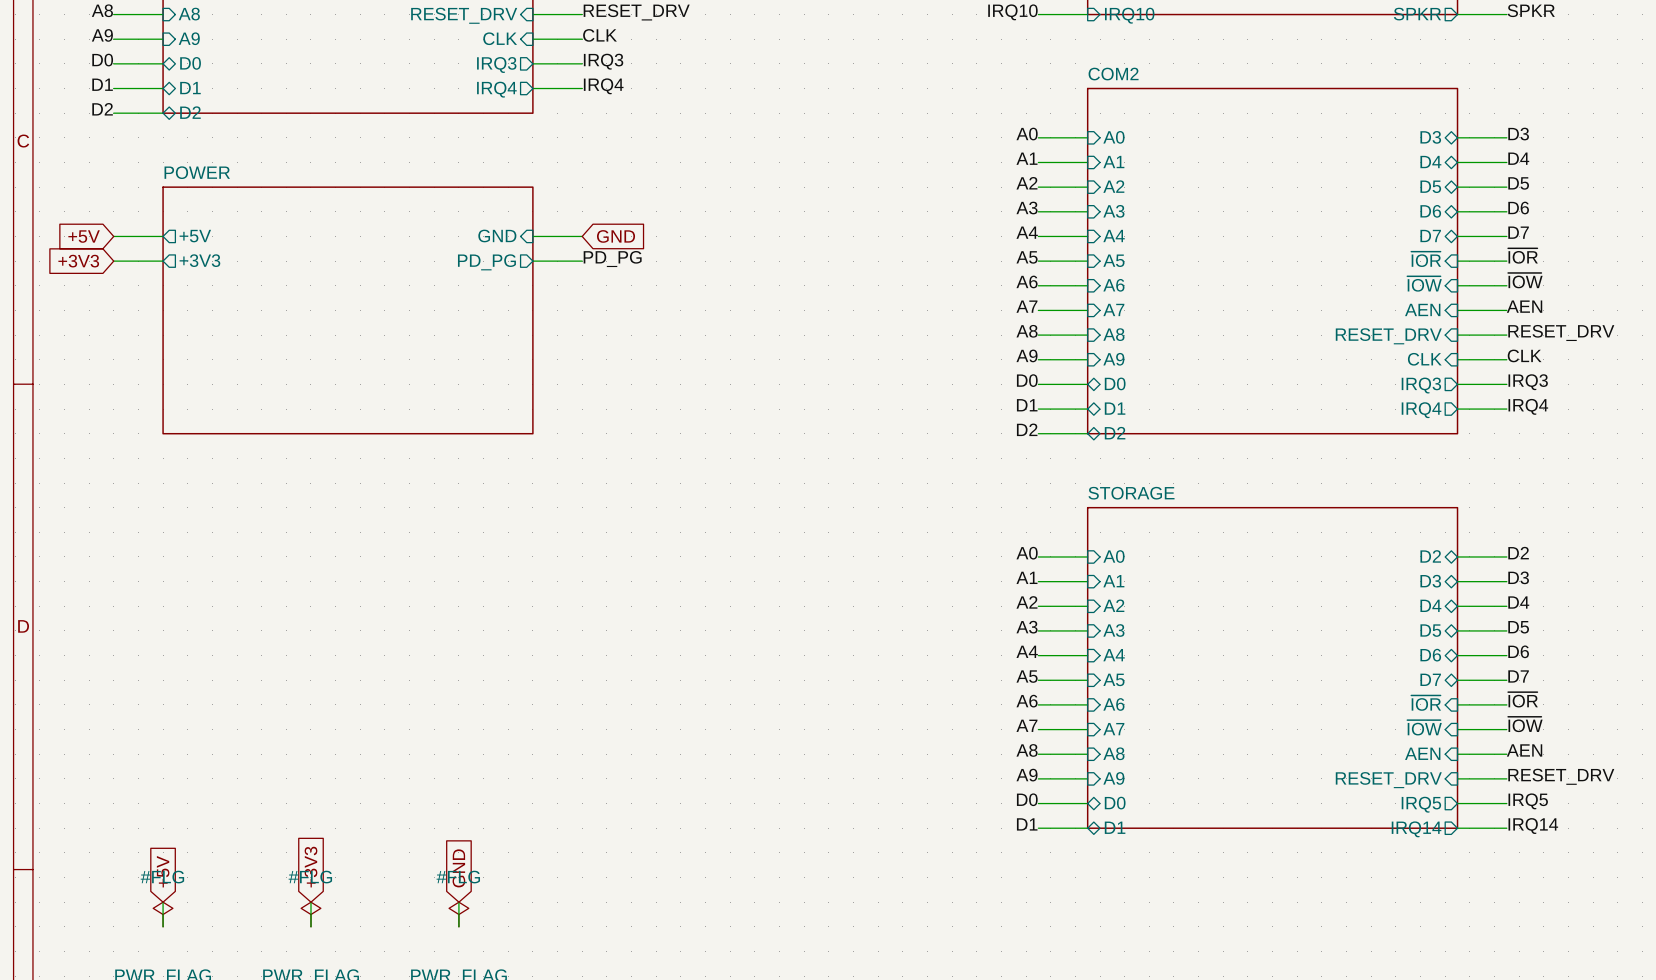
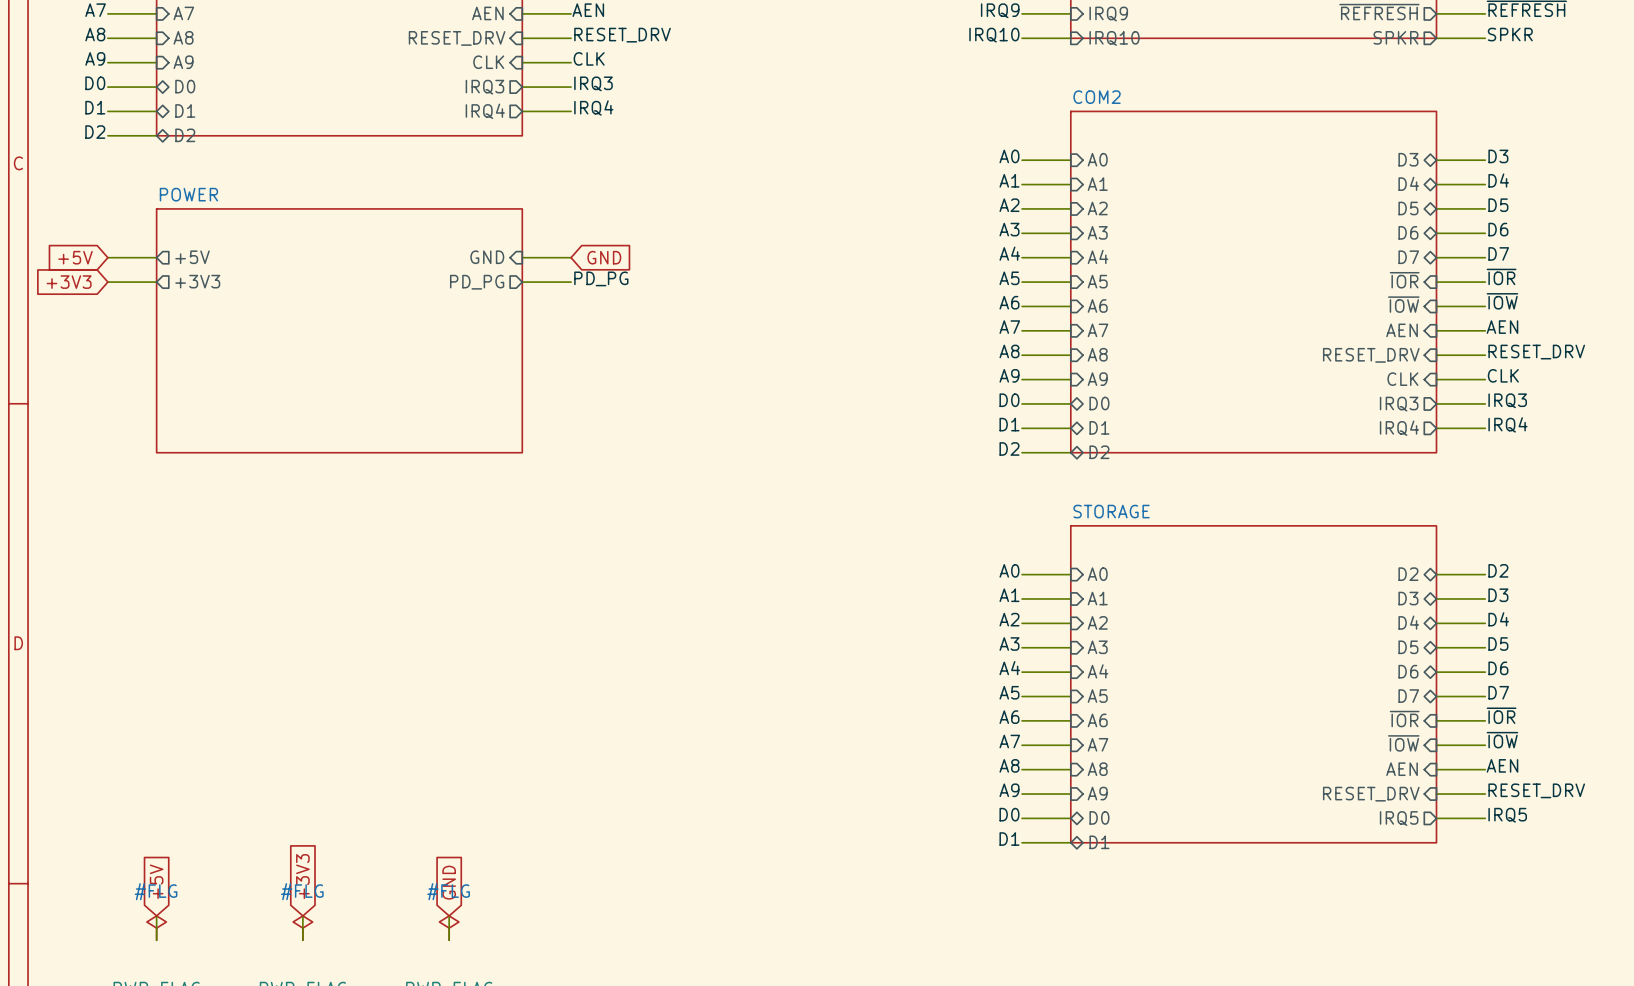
label: IRQ14 (1533, 826) -> none
wire: (1457, 828) (1506, 828) -> none
sheet pin: IRQ14 (1416, 829) -> none

